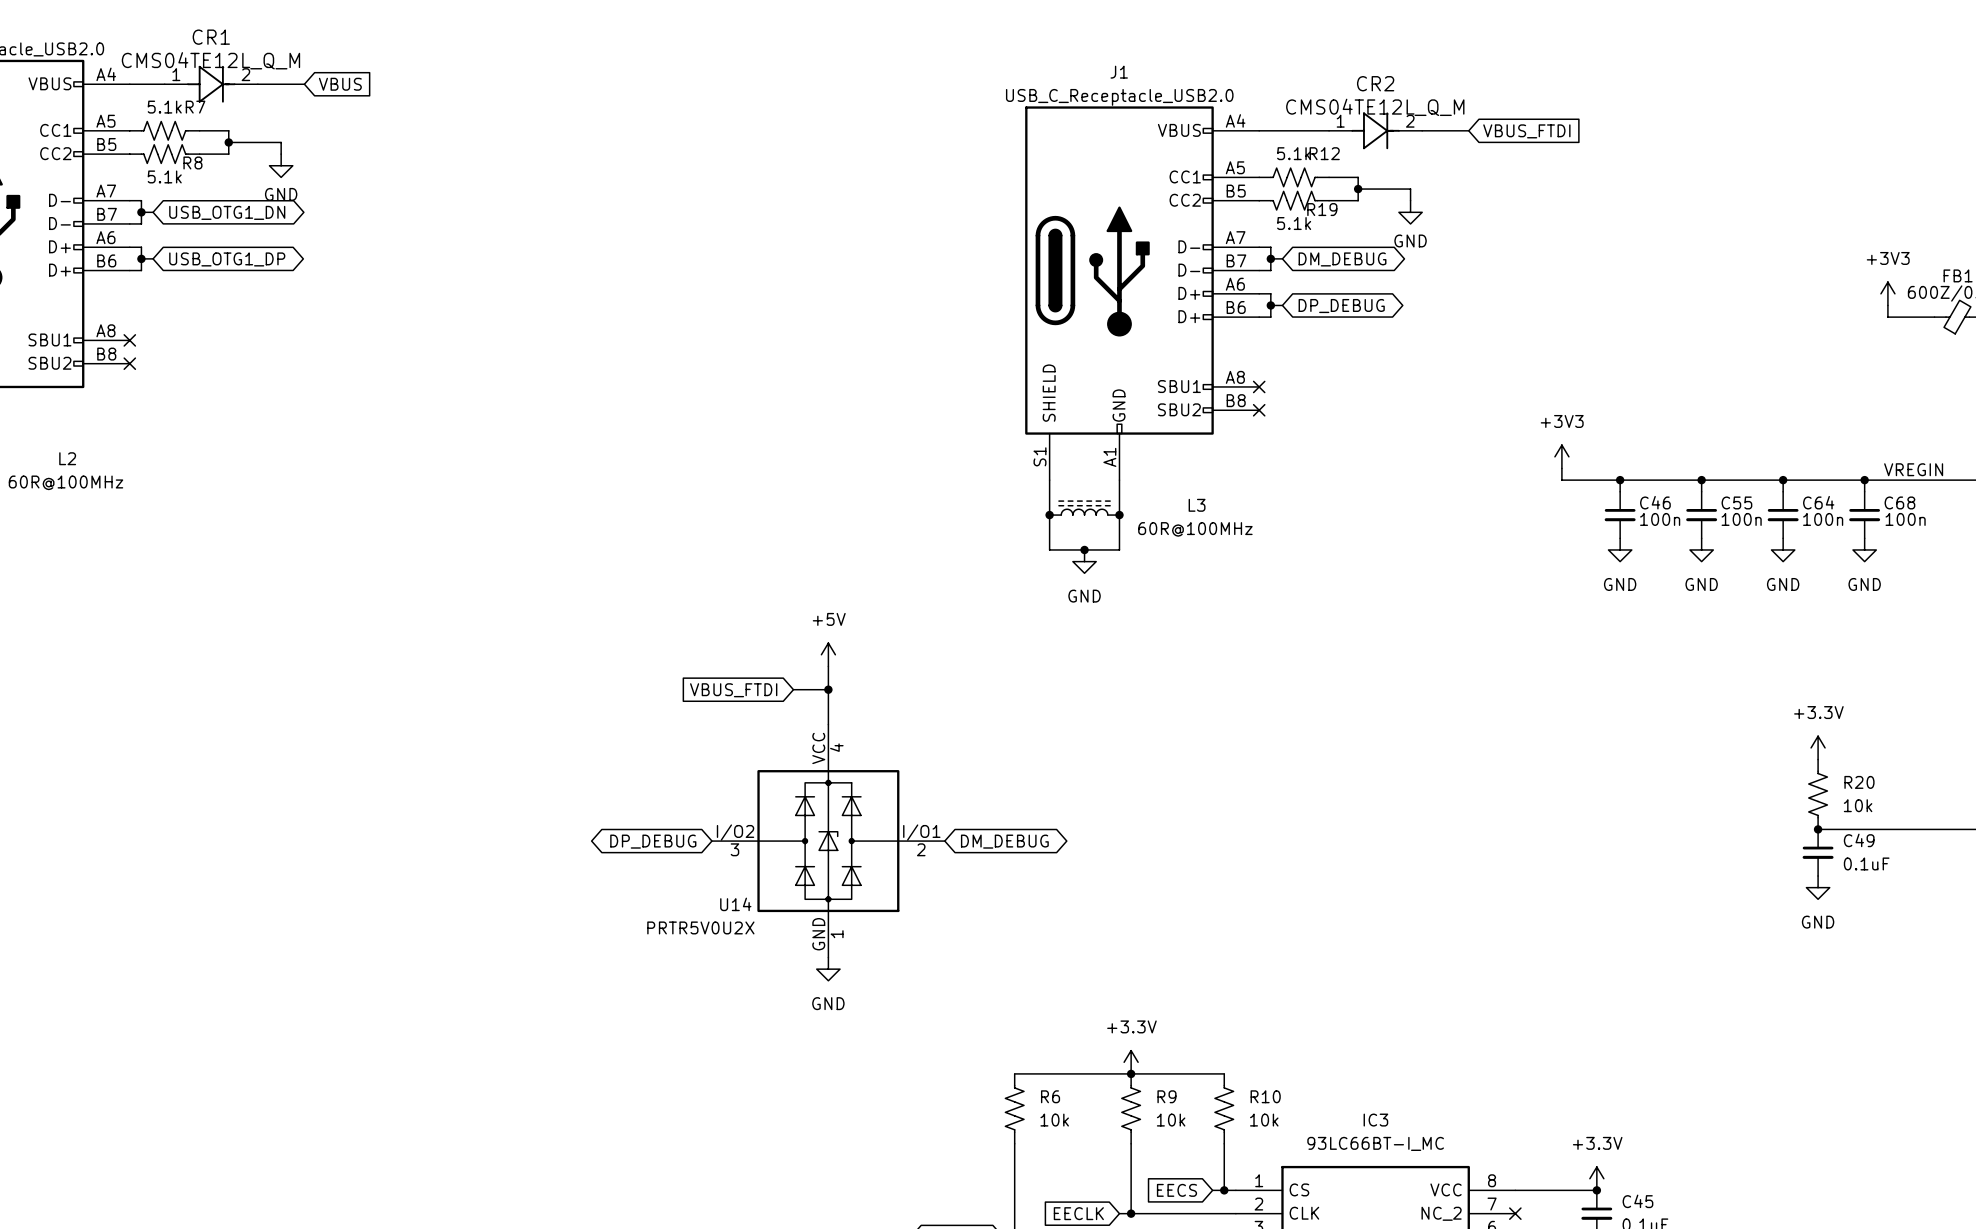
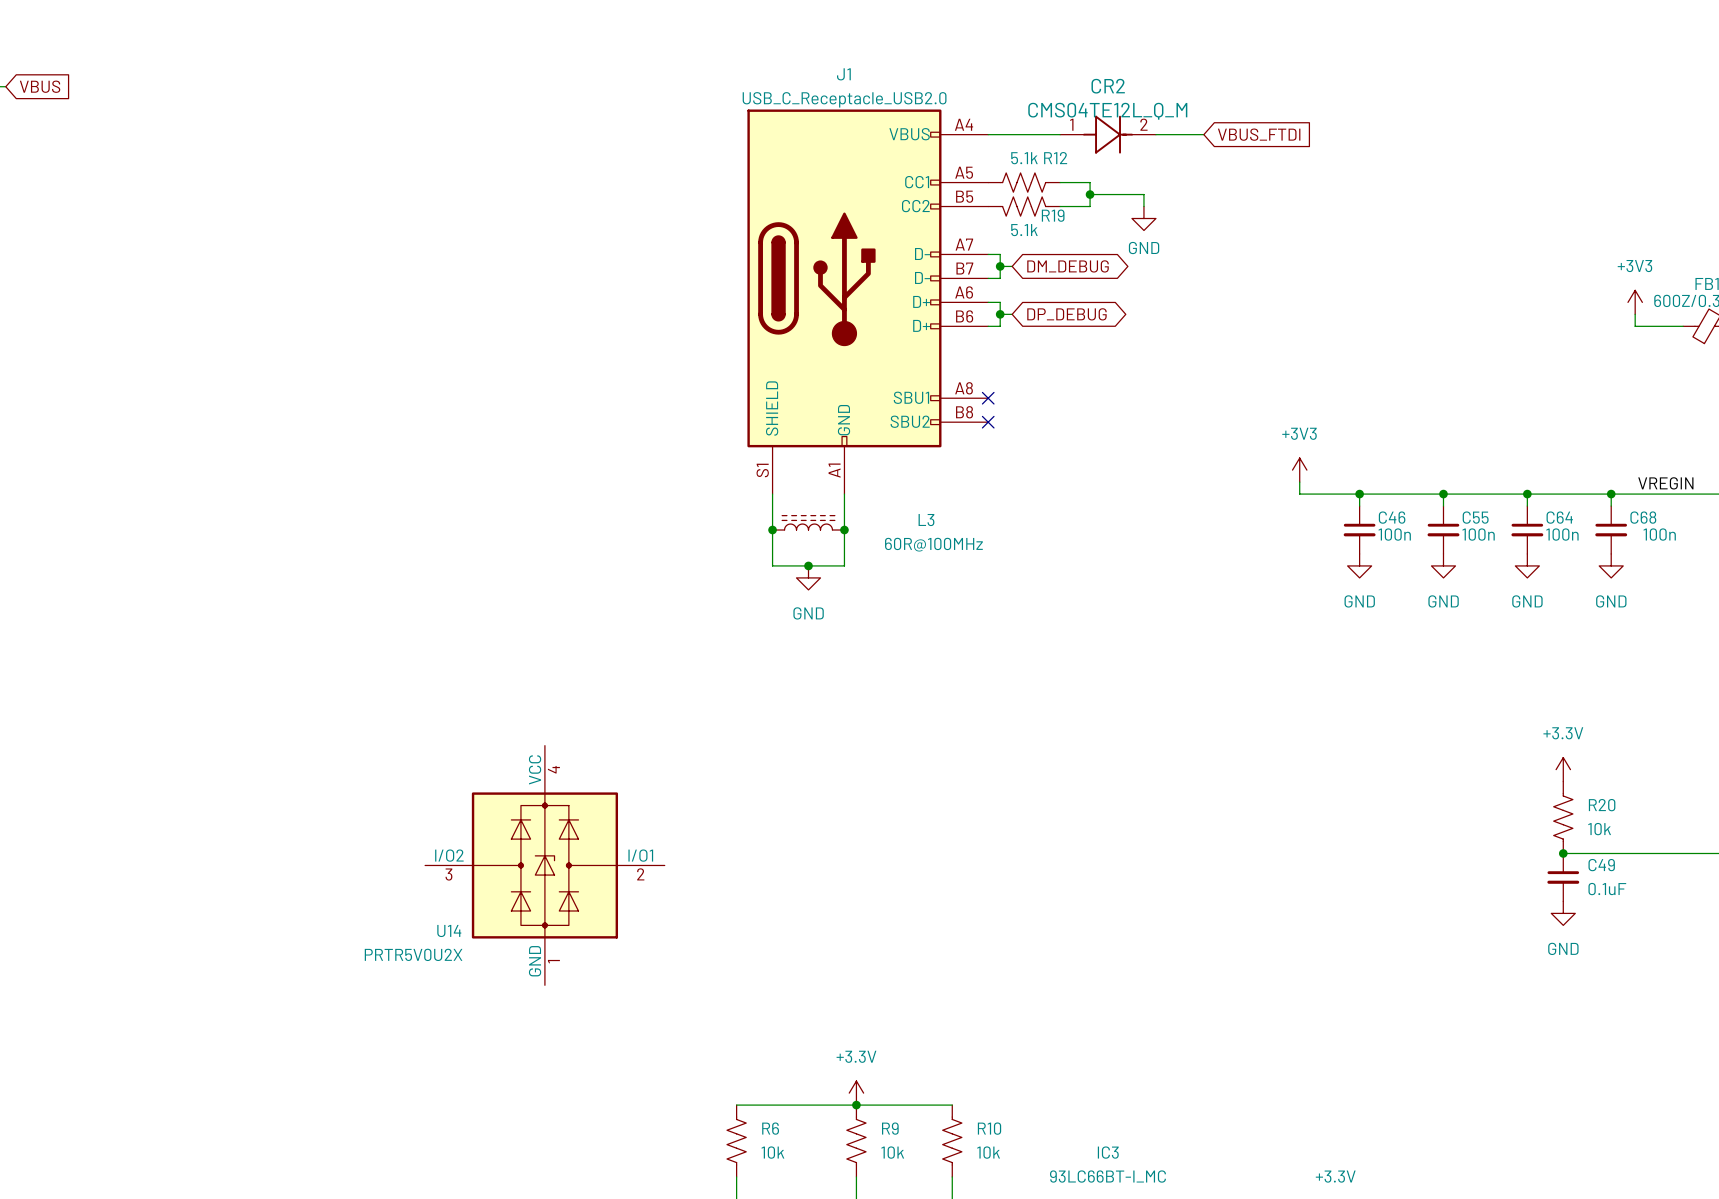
power symbol: +5V (828, 654) -> none
wire: (828, 666) (828, 724) -> none
wire: (793, 689) (828, 689) -> none
junction: (828, 689) -> none
global label: VBUS_FTDI (733, 690) -> none
global label: DP_DEBUG (653, 841) -> none
global label: DM_DEBUG (1004, 841) -> none
power symbol: GND (828, 969) -> none

